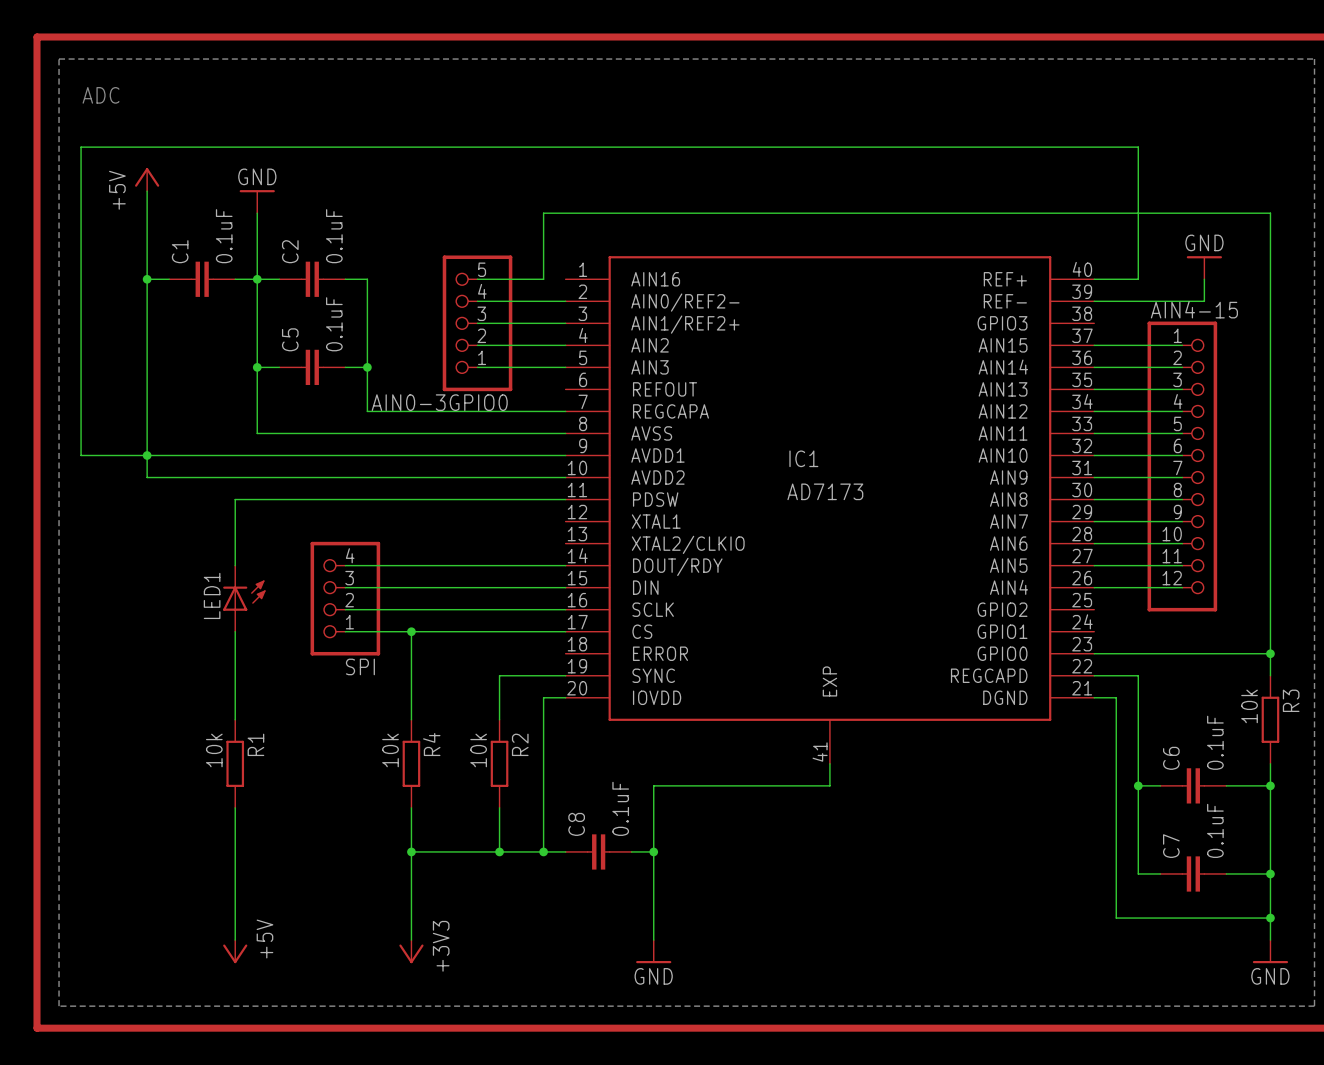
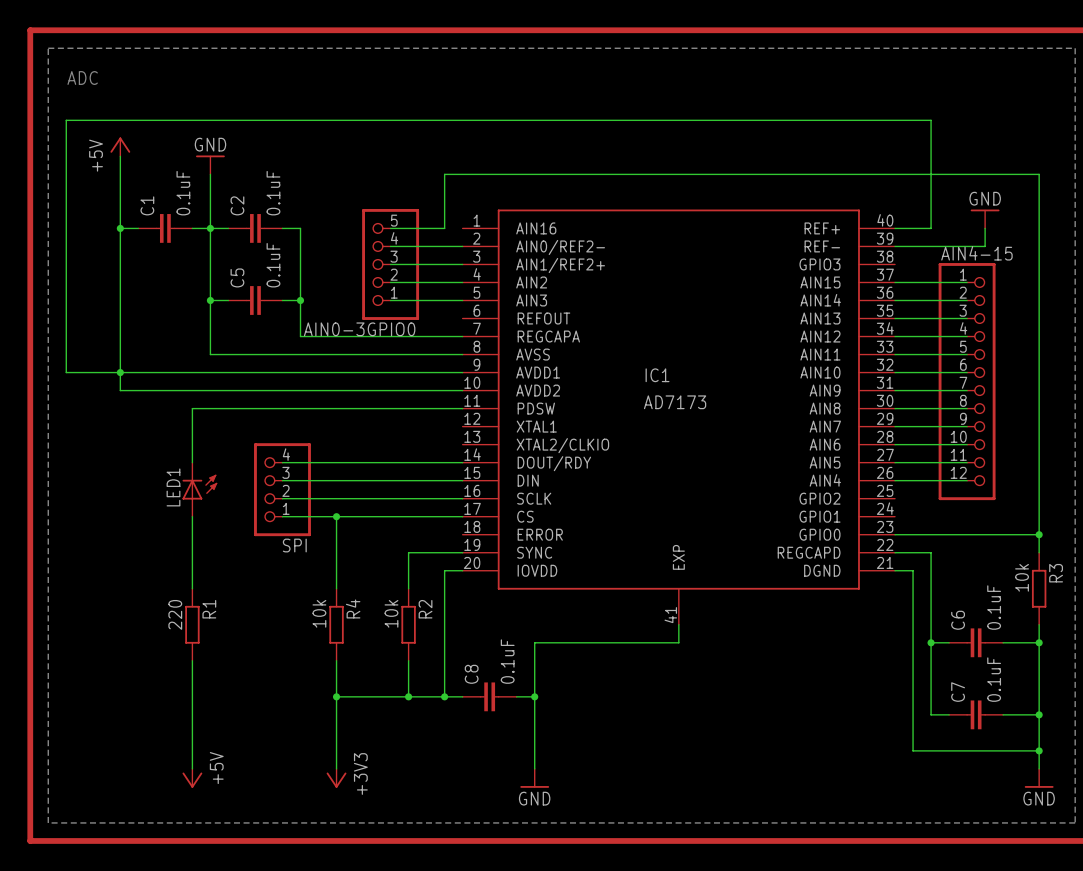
R1 value: 10k (214, 750) -> 220 (175, 614)

